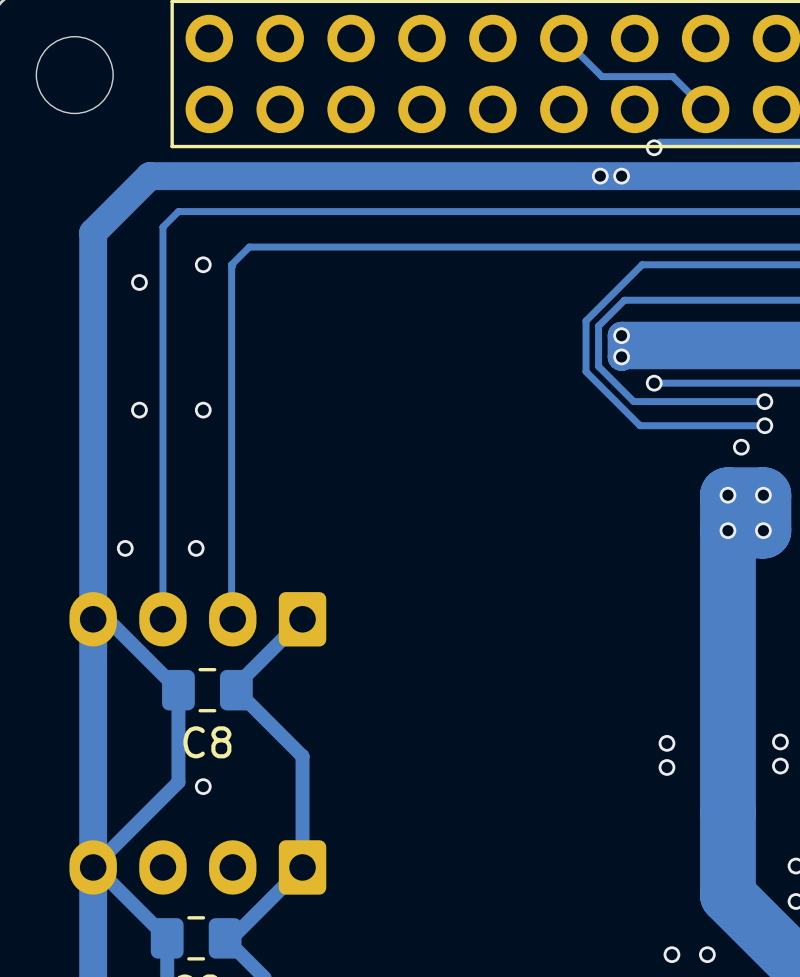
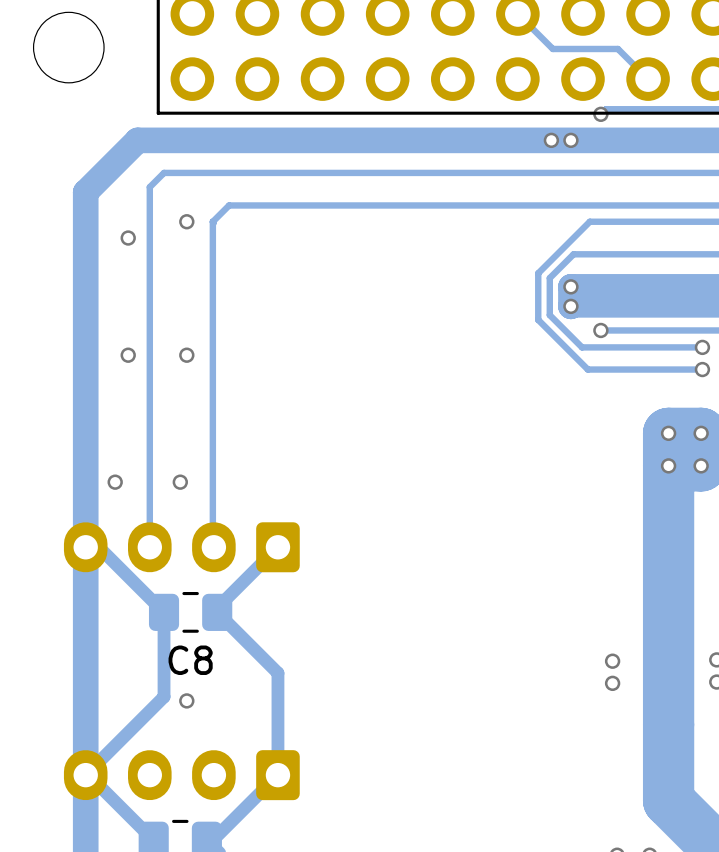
via: (741, 447) -> none

